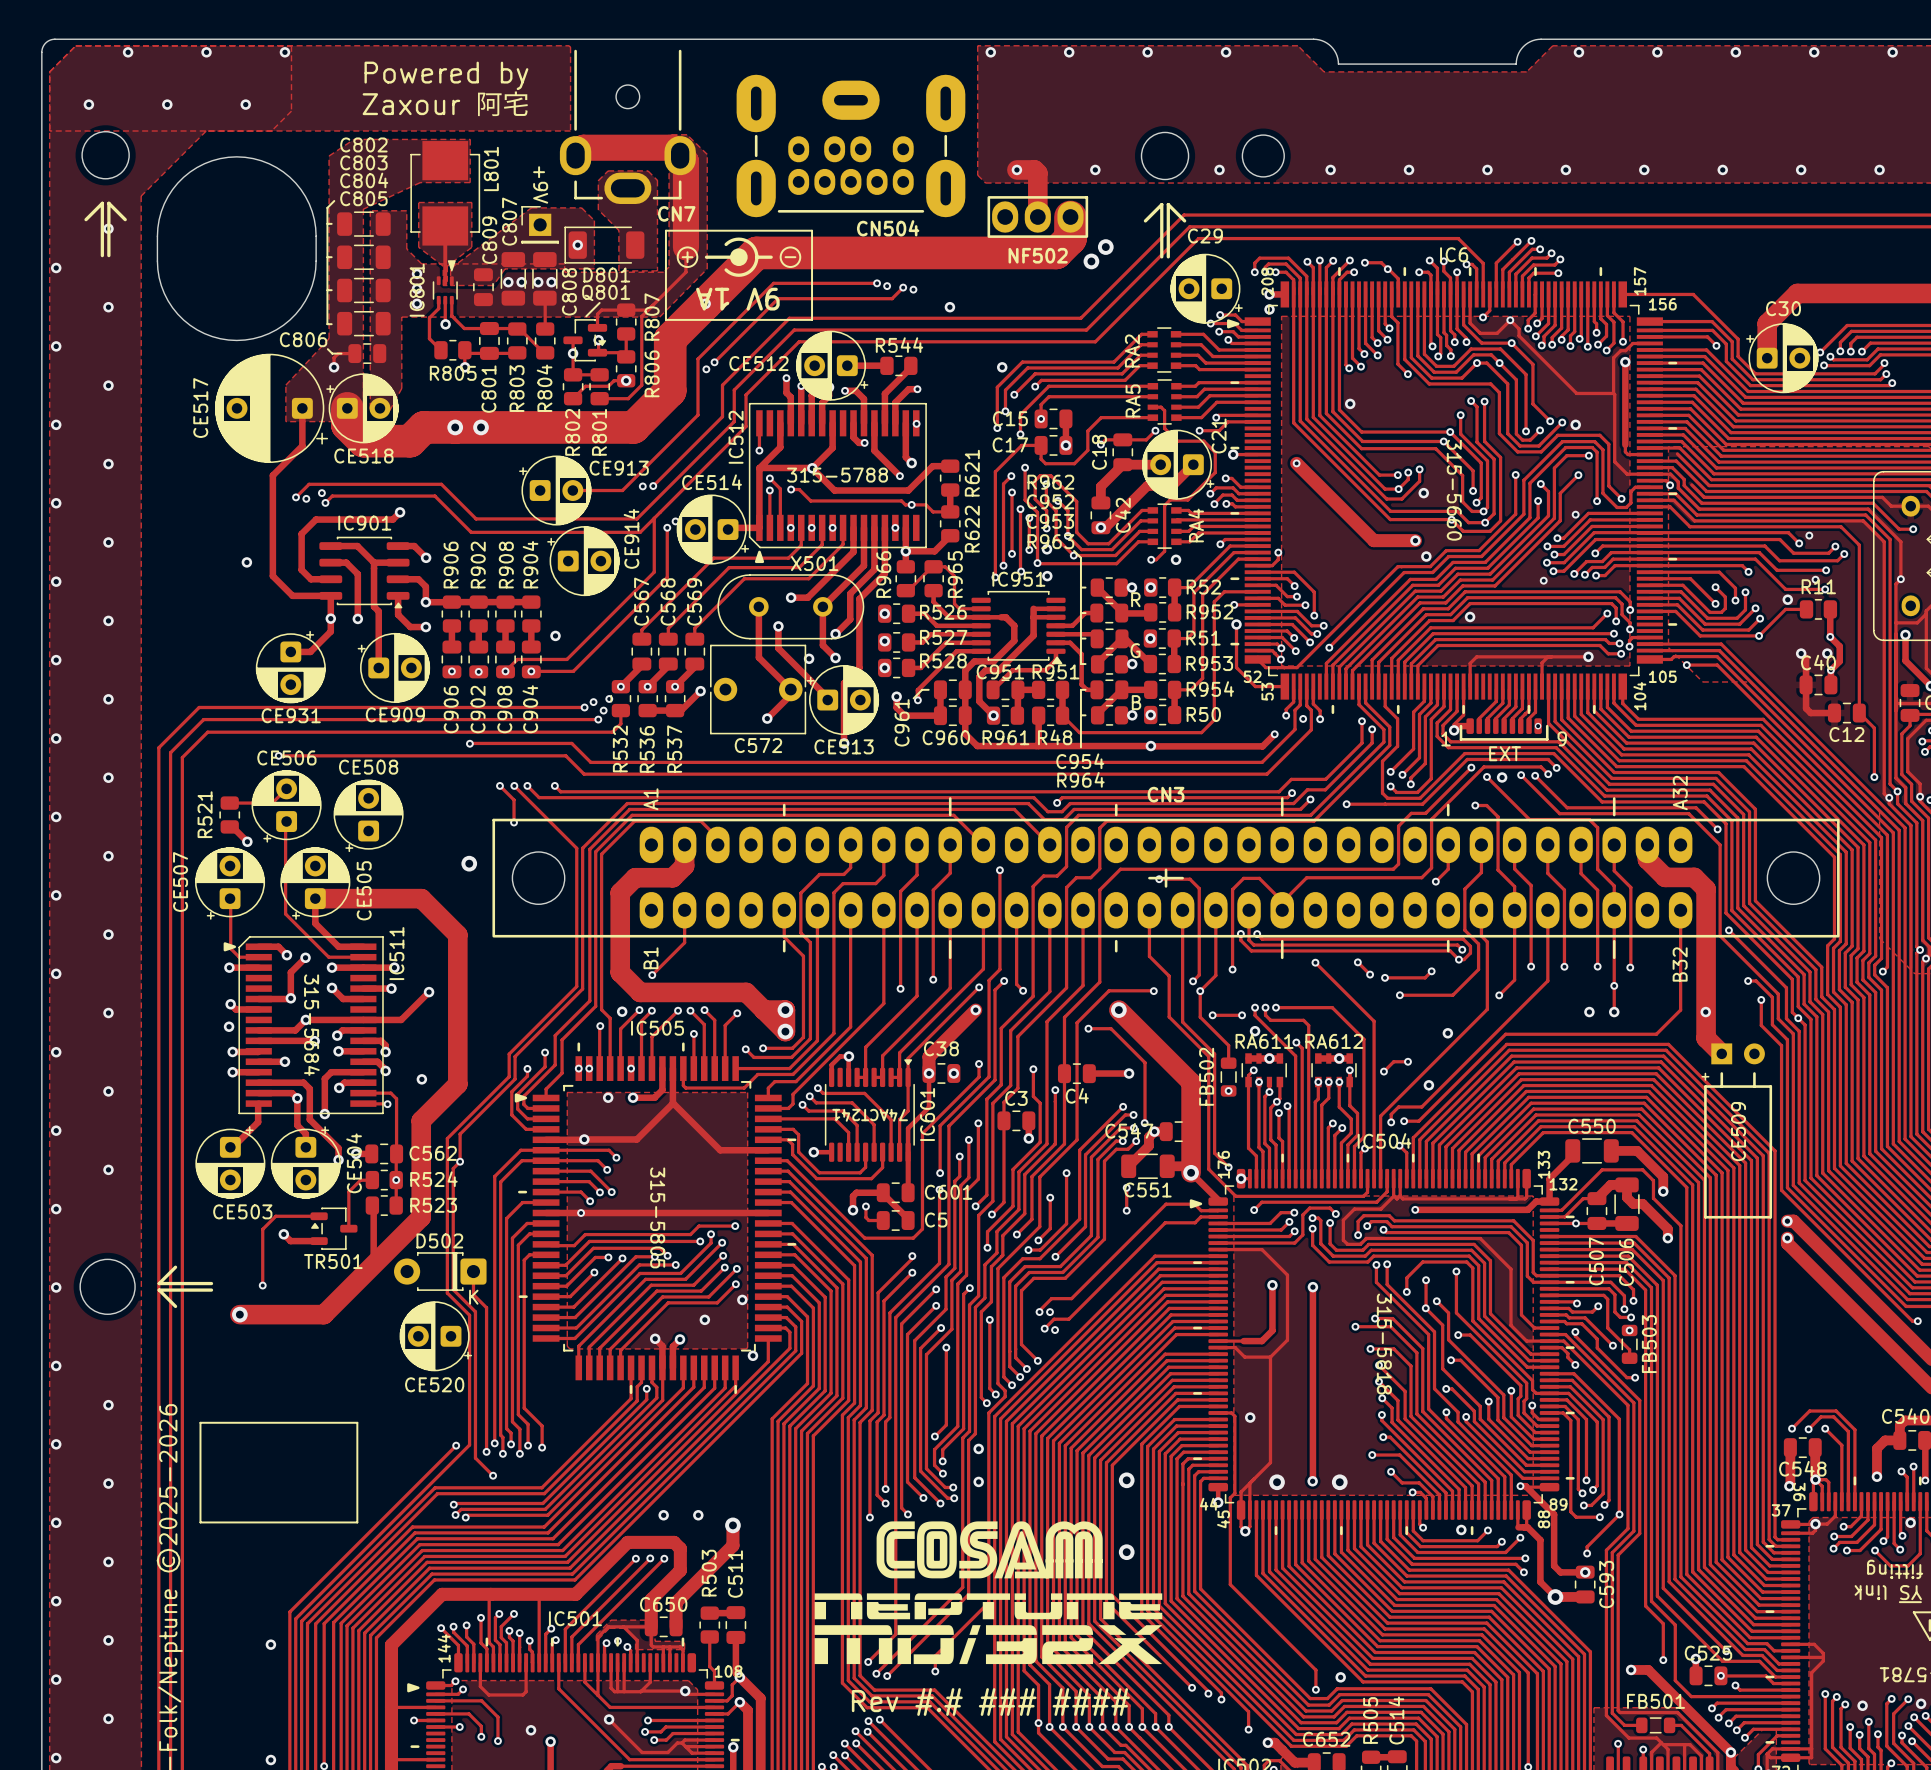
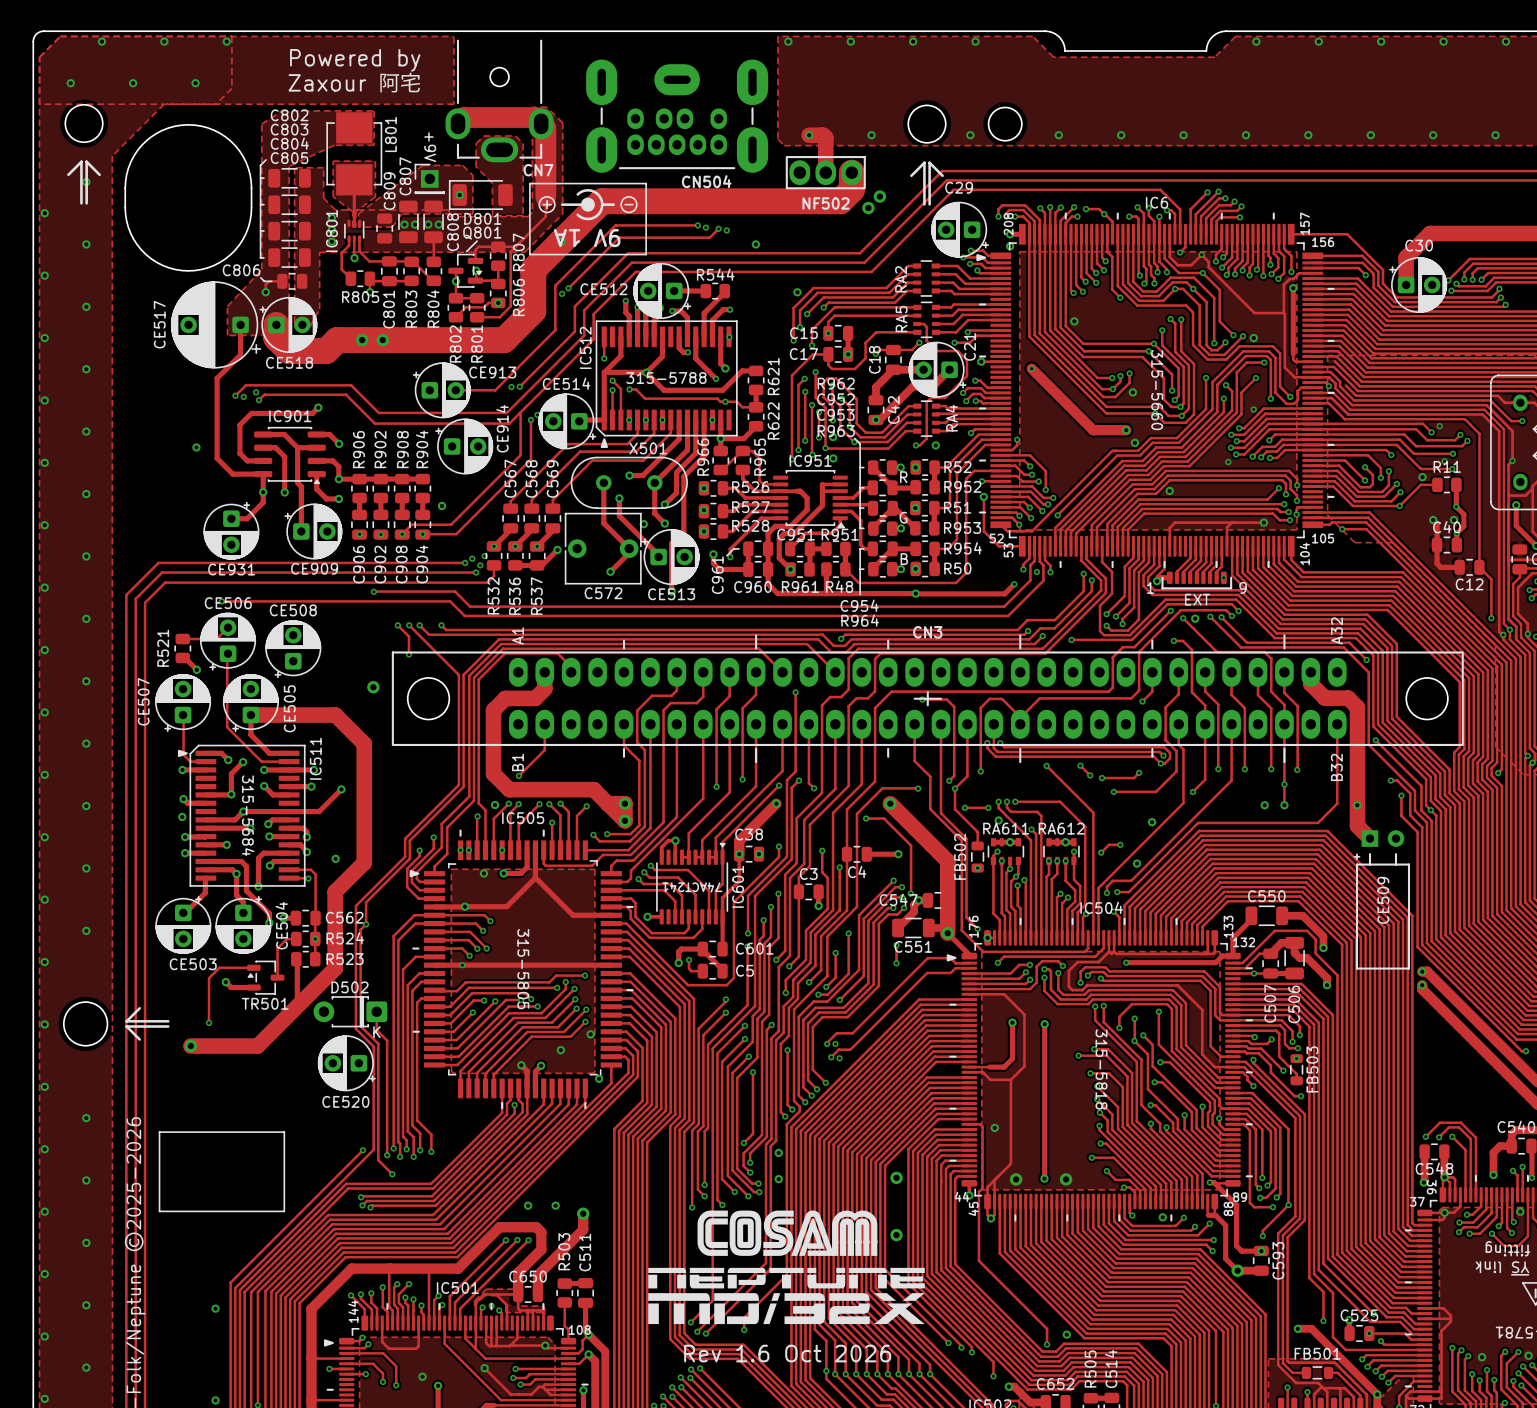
IC801 footprint: [432, 260, 458, 305] -> [344, 219, 365, 243]
text: Rev #.# ### #### (990, 1702) -> Rev 1.6 Oct 2026 (787, 1353)

